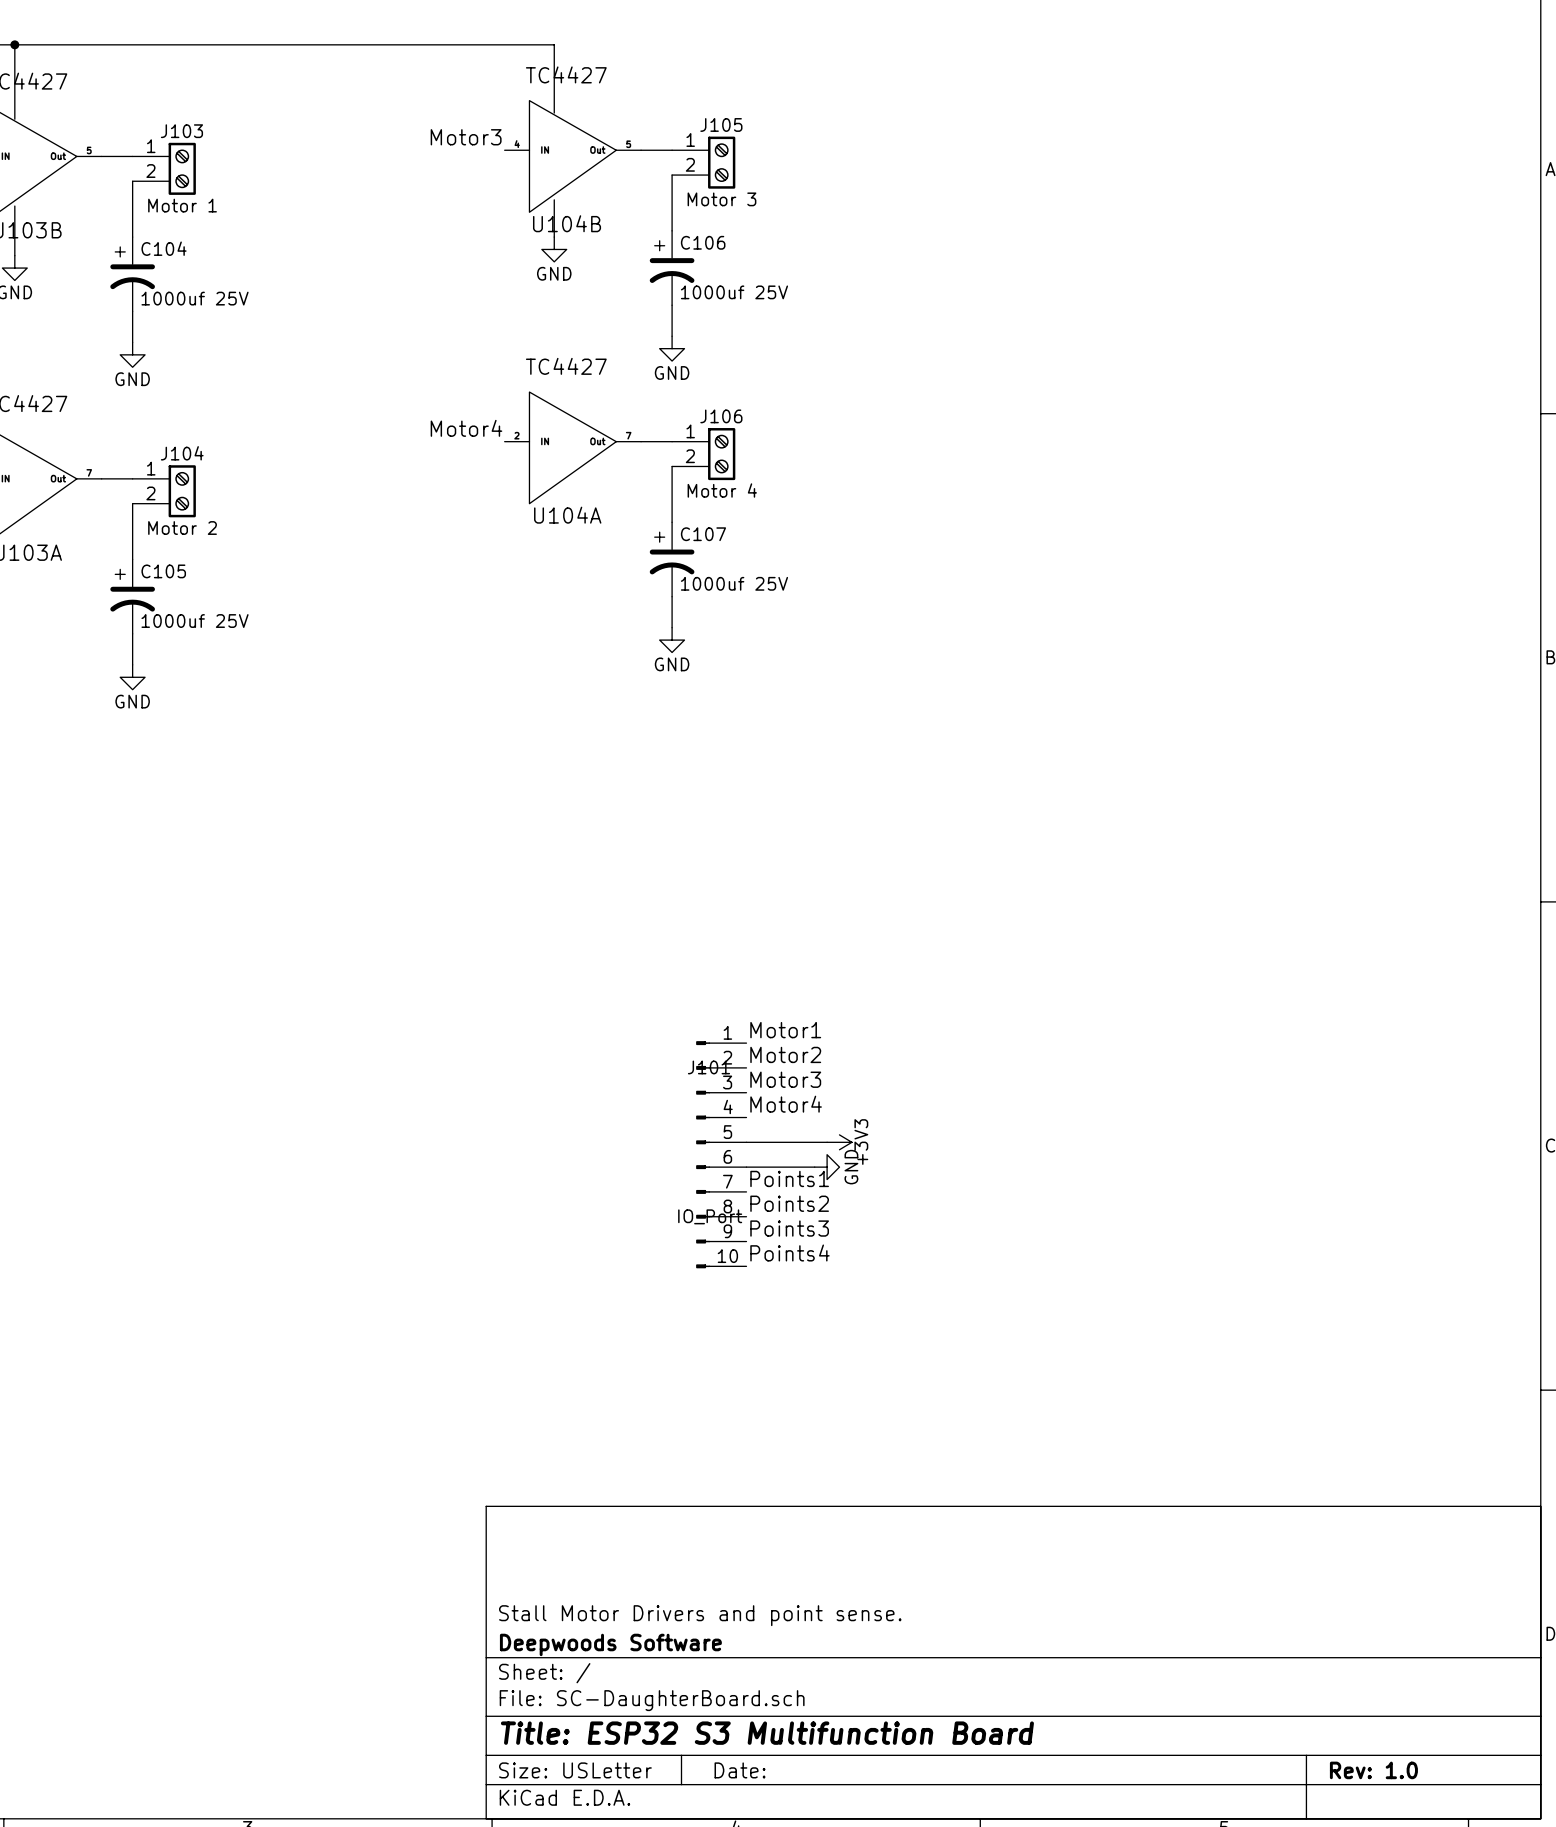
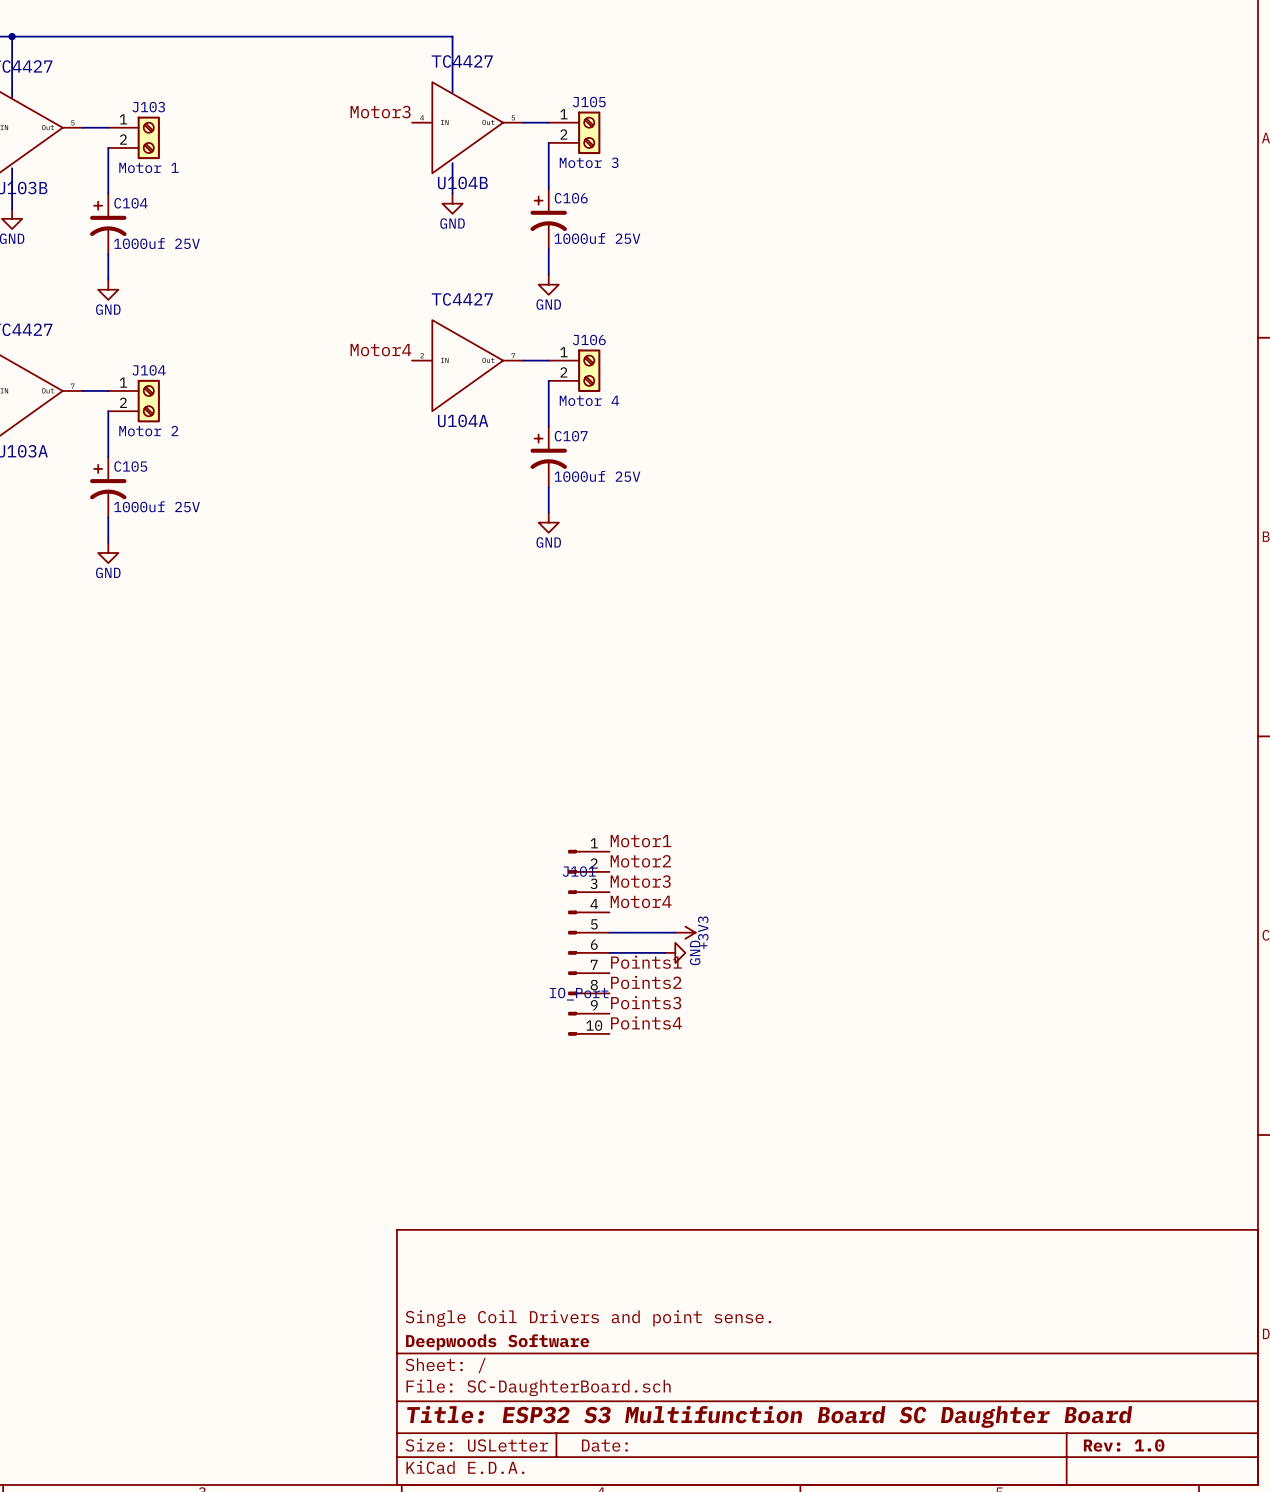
title block: Stall Motor Drivers and point sense. (700, 1615) -> Single Coil Drivers and point sense. (588, 1318)
title block: Title: ESP32 S3 Multifunction Board (767, 1733) -> Title: ESP32 S3 Multifunction Board SC Daughter Board (769, 1416)

